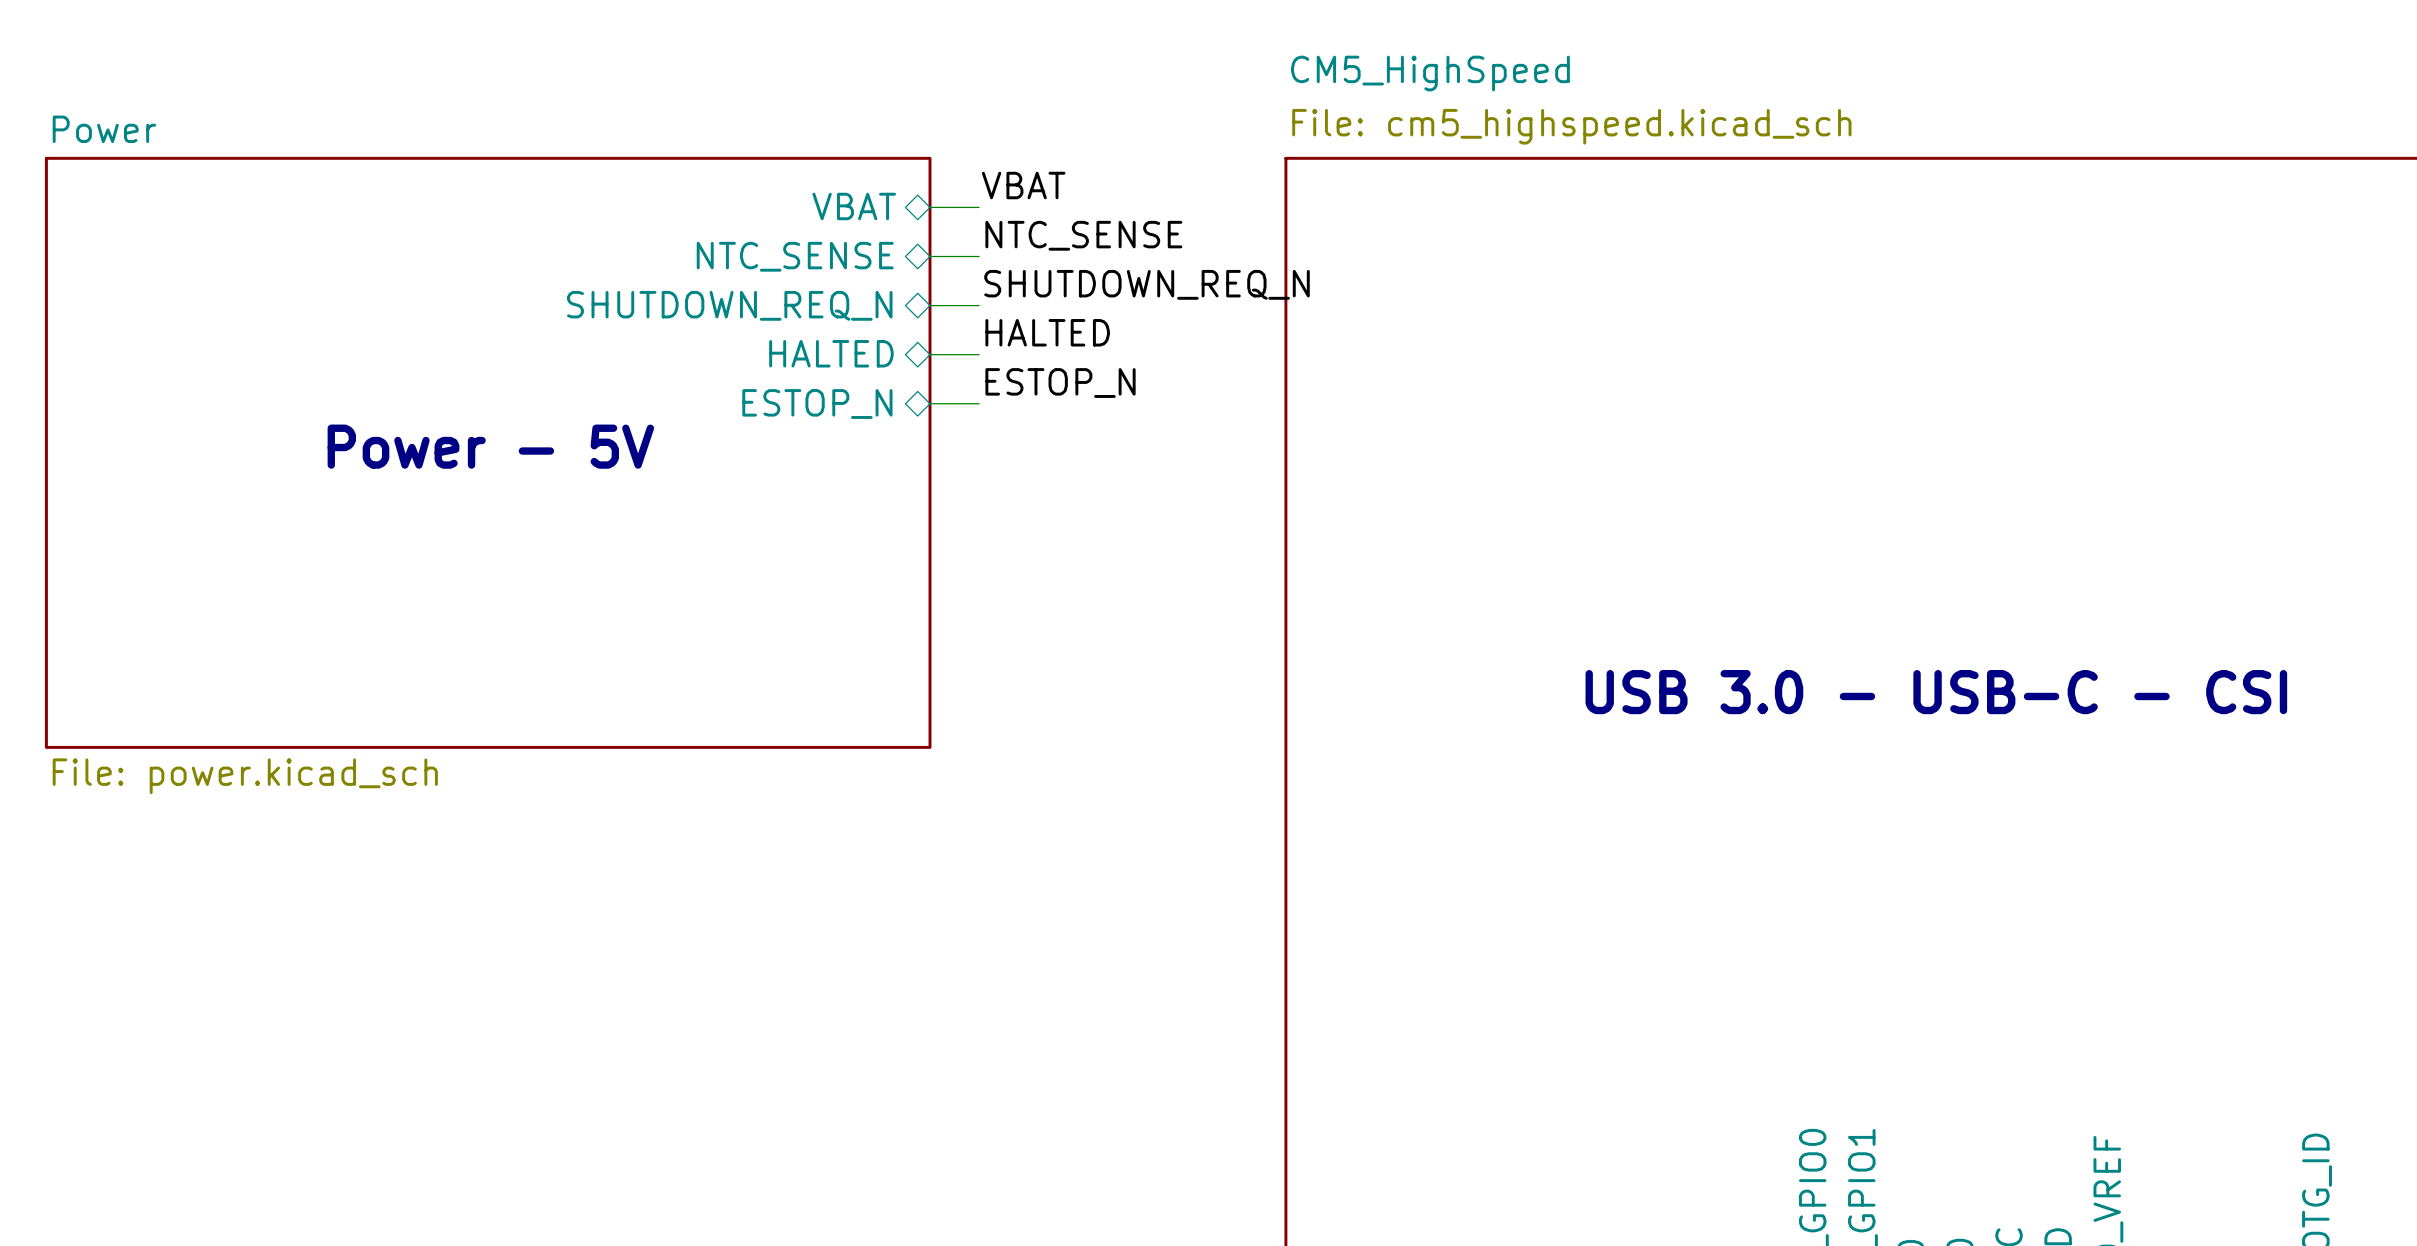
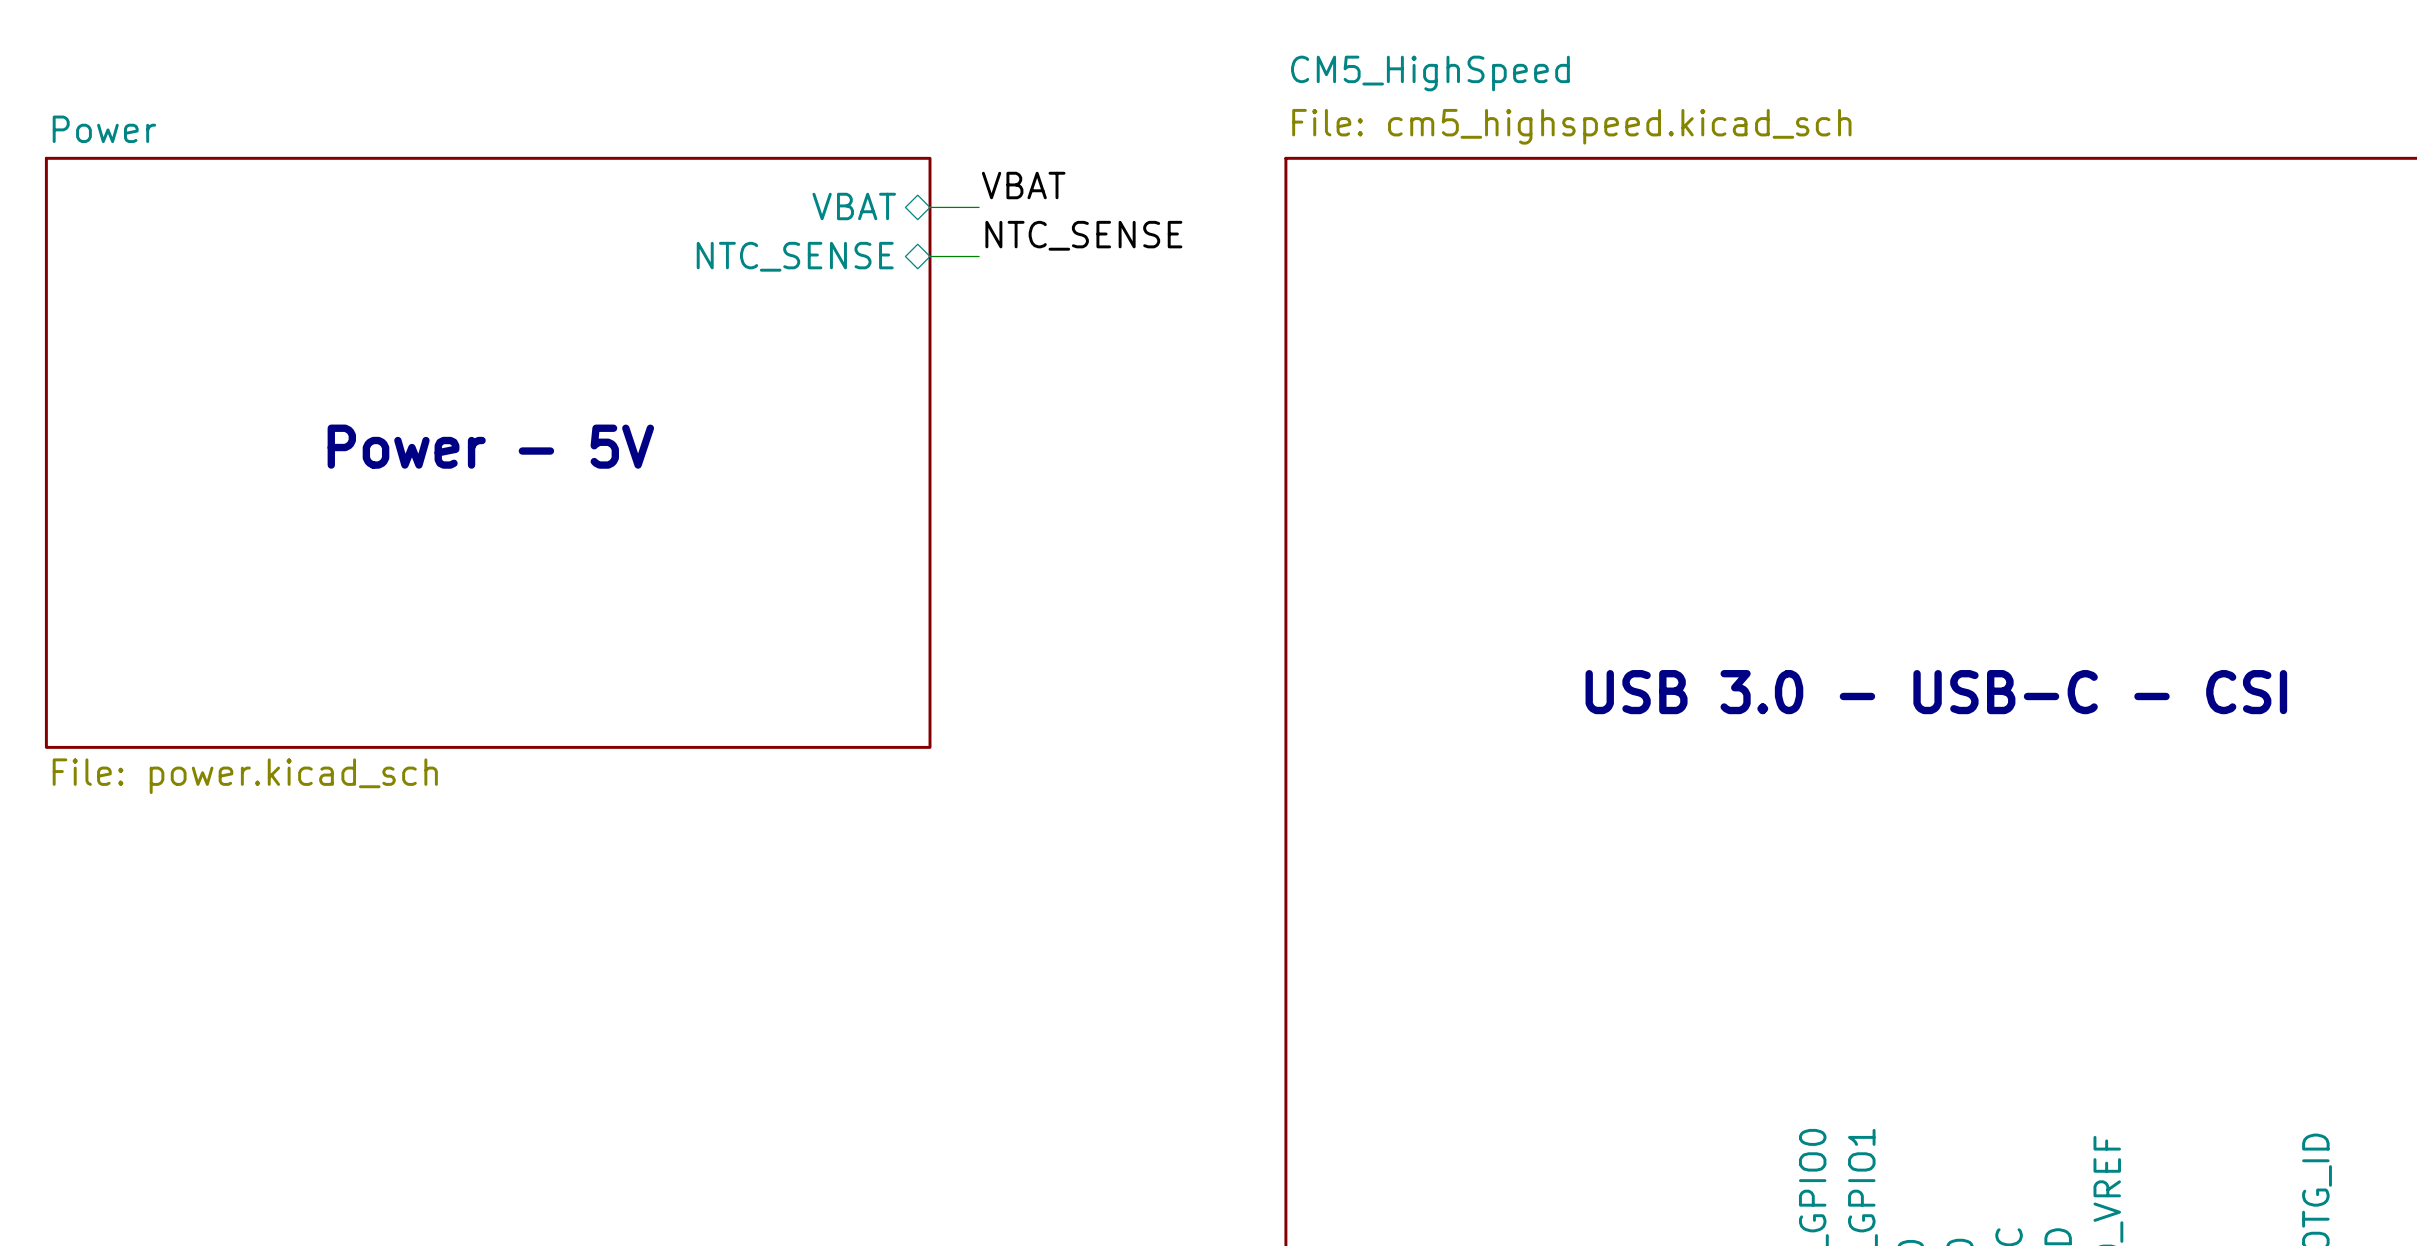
label: SHUTDOWN_REQ_N (1147, 284) -> none
sheet pin: SHUTDOWN_REQ_N (729, 305) -> none
wire: (930, 305) (979, 305) -> none
label: HALTED (1047, 332) -> none
sheet pin: HALTED (831, 353) -> none
wire: (930, 354) (979, 354) -> none
label: ESTOP_N (1060, 383) -> none
wire: (930, 403) (979, 403) -> none
sheet pin: ESTOP_N (817, 404) -> none

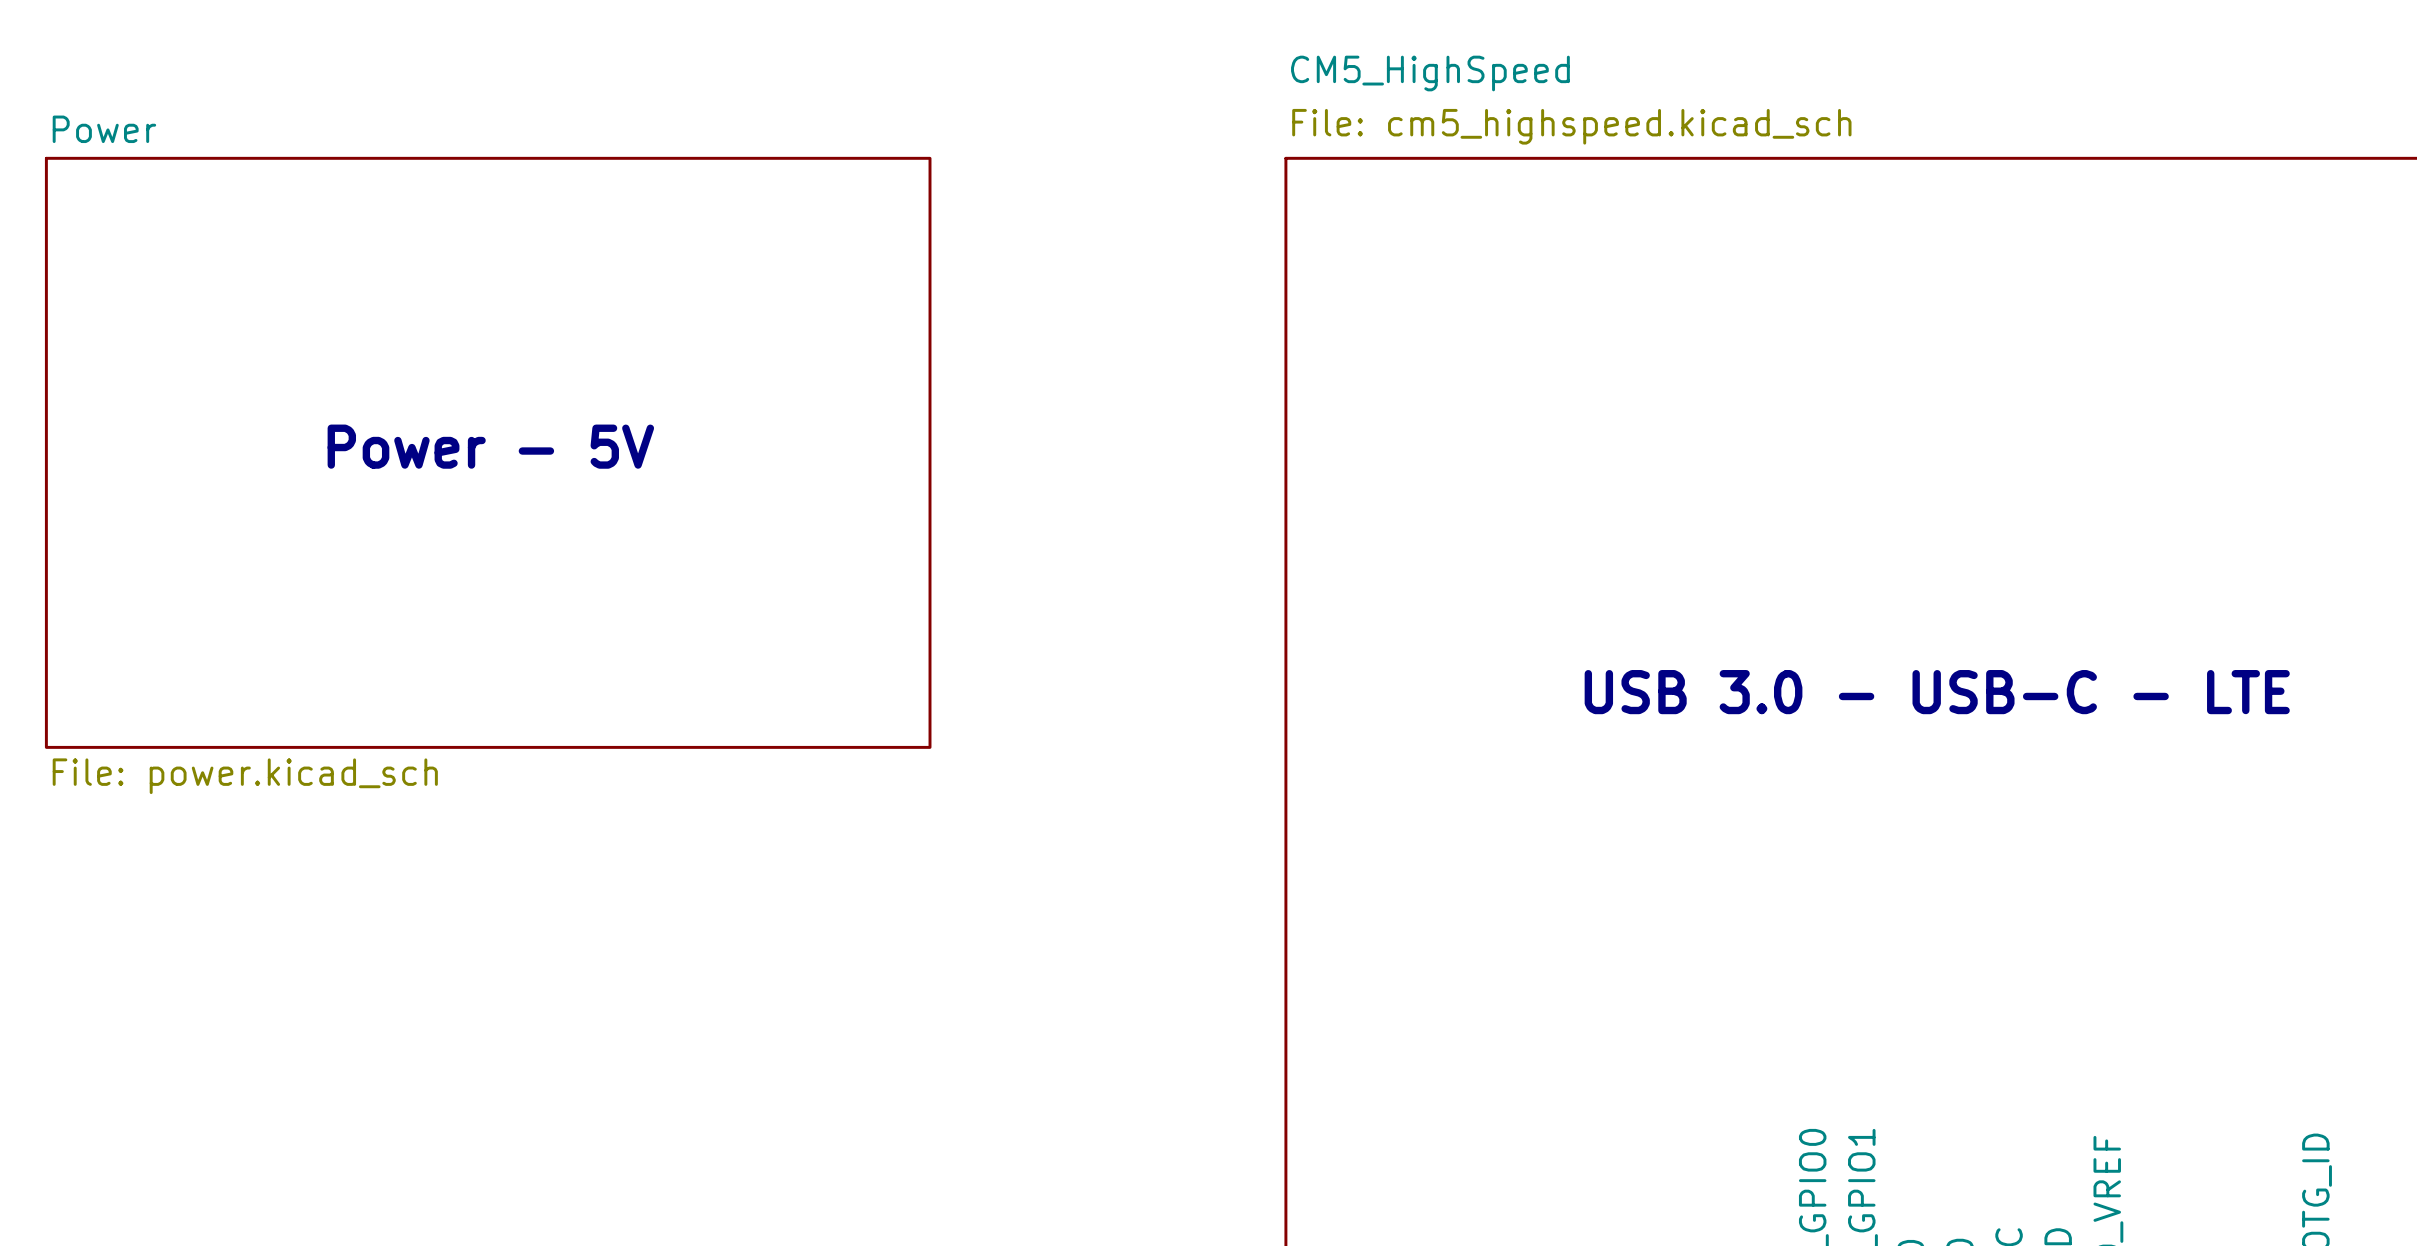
label: VBAT (1023, 185) -> none
sheet pin: VBAT (854, 206) -> none
wire: (930, 207) (979, 207) -> none
label: NTC_SENSE (1083, 235) -> none
sheet pin: NTC_SENSE (795, 256) -> none
wire: (930, 256) (979, 256) -> none
text: USB 3.0 - USB-C - CSI (1936, 692) -> USB 3.0 - USB-C - LTE (1937, 692)

